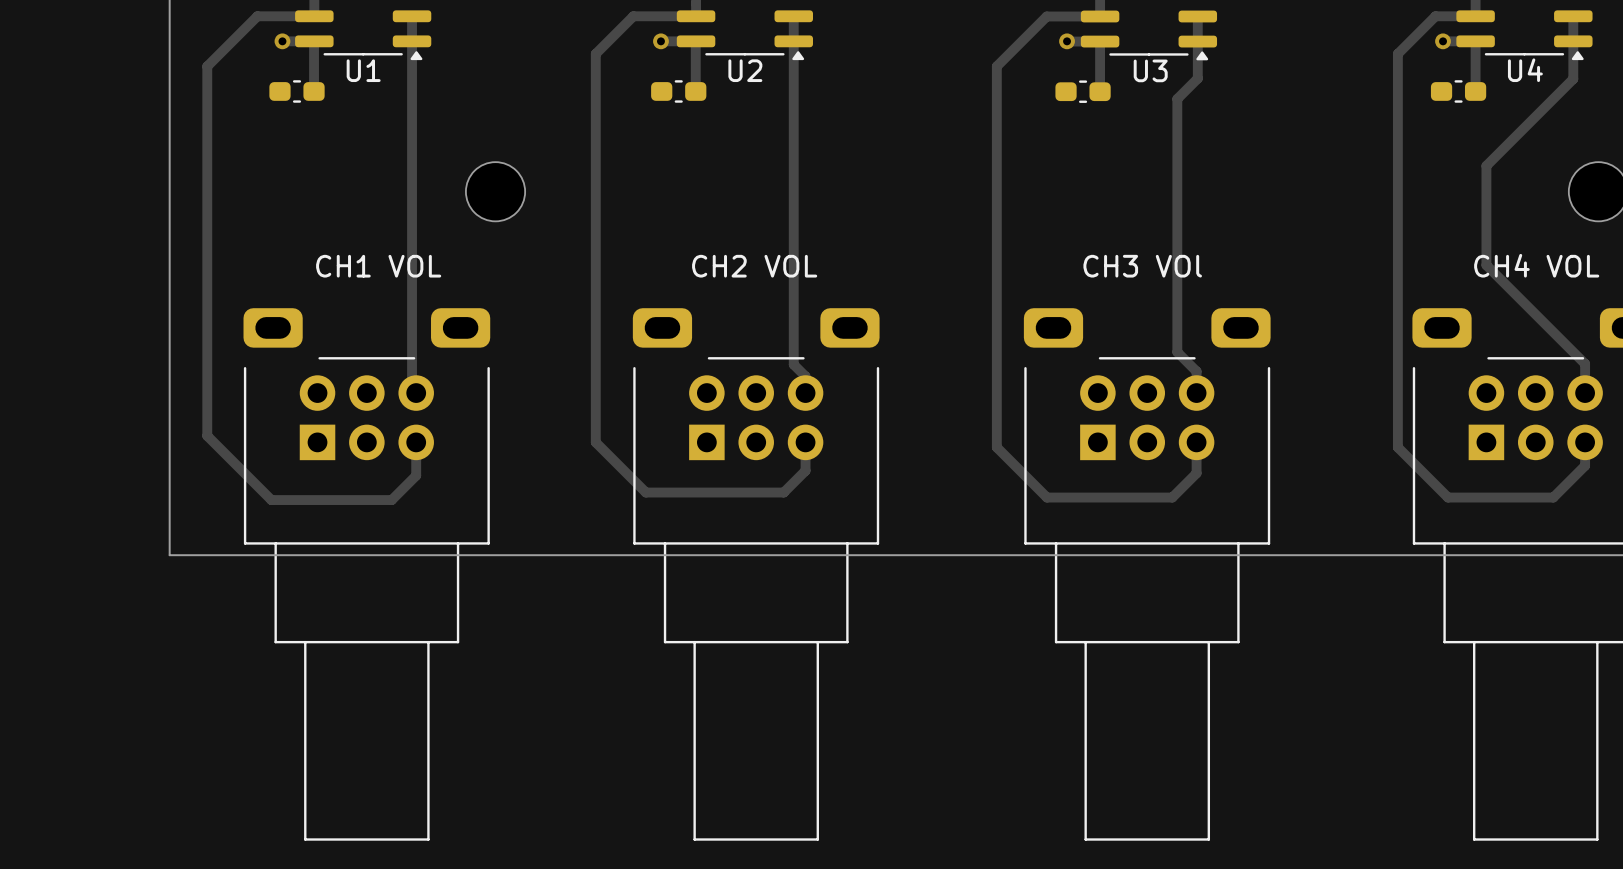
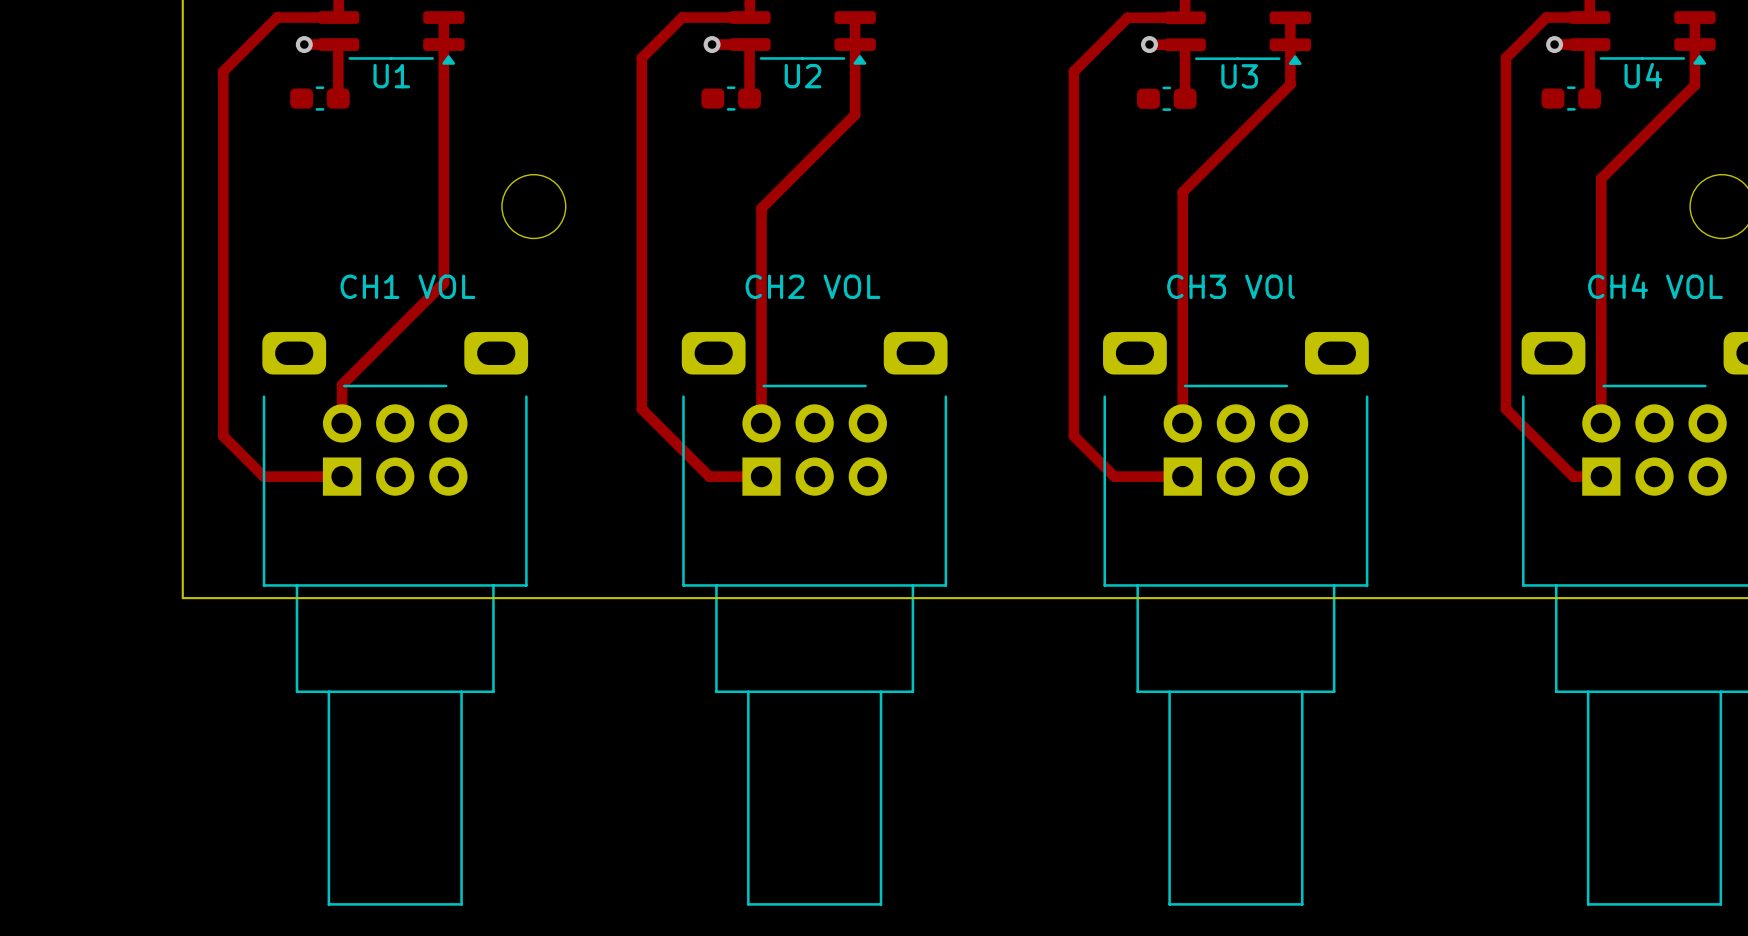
track: (1177, 98) (1177, 352) (1196, 371) (1196, 393) -> (1268, 106) (1182, 192) (1182, 423)
track: (793, 106) (793, 364) (805, 376) (805, 393) -> (855, 114) (761, 208) (761, 423)
track: (412, 262) (412, 388) (416, 393) -> (443, 283) (342, 384) (342, 423)
track: (1486, 265) (1585, 363) (1585, 393) -> (1601, 285) (1601, 423)
track: (595, 379) (595, 442) (645, 492) (783, 492) (805, 470) (805, 442) -> (641, 409) (709, 476) (761, 476)
track: (1397, 379) (1397, 447) (1448, 497) (1553, 497) (1585, 465) (1585, 442) -> (1505, 409) (1573, 476) (1601, 476)
track: (207, 404) (207, 435) (271, 500) (391, 500) (416, 475) (416, 442) -> (223, 436) (263, 476) (342, 476)
track: (996, 404) (996, 447) (1046, 497) (1172, 497) (1196, 473) (1196, 442) -> (1073, 436) (1114, 476) (1182, 476)

